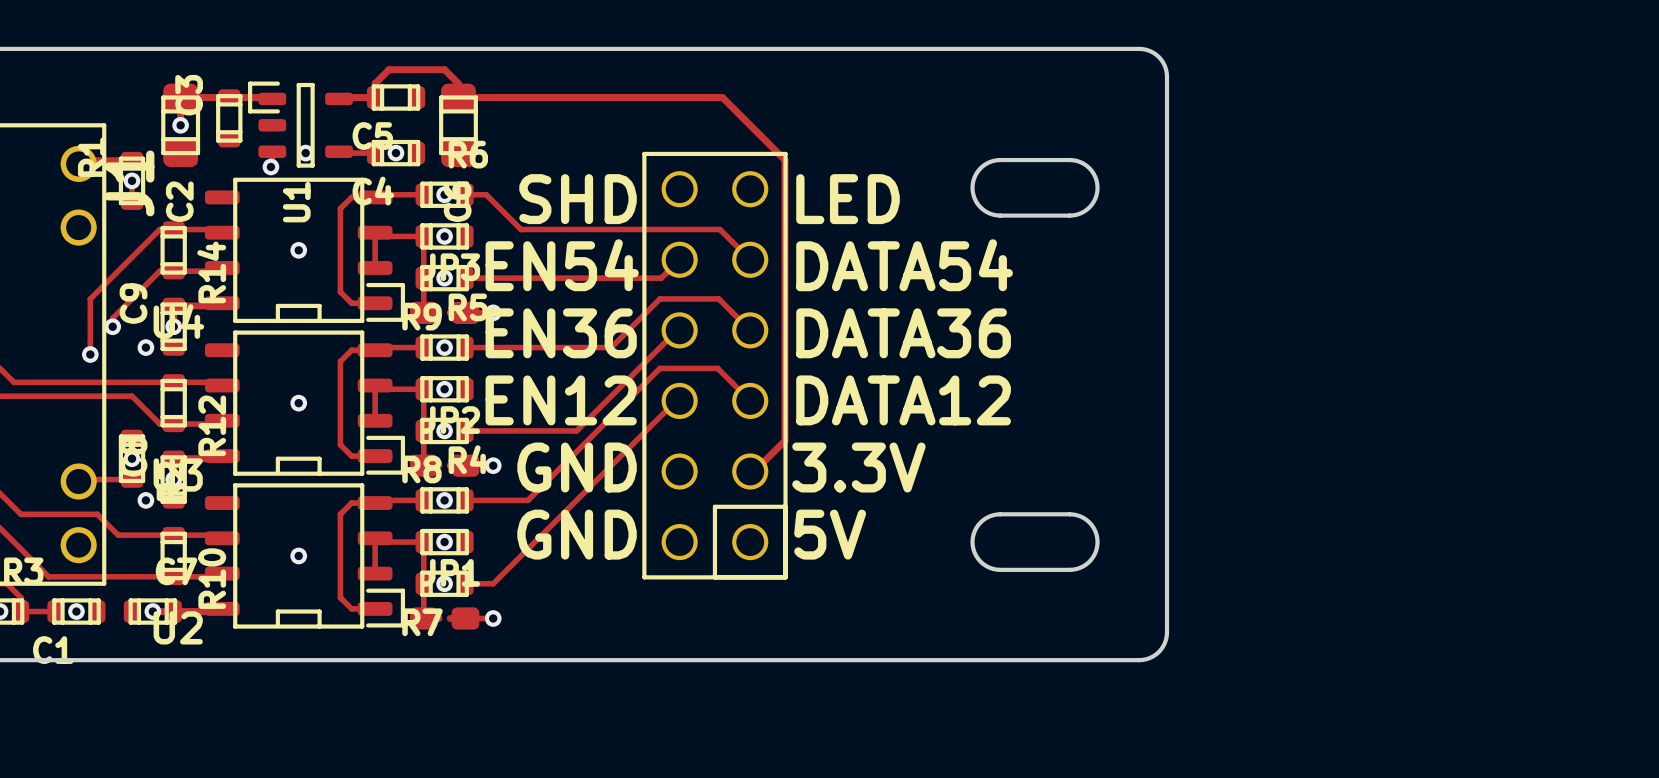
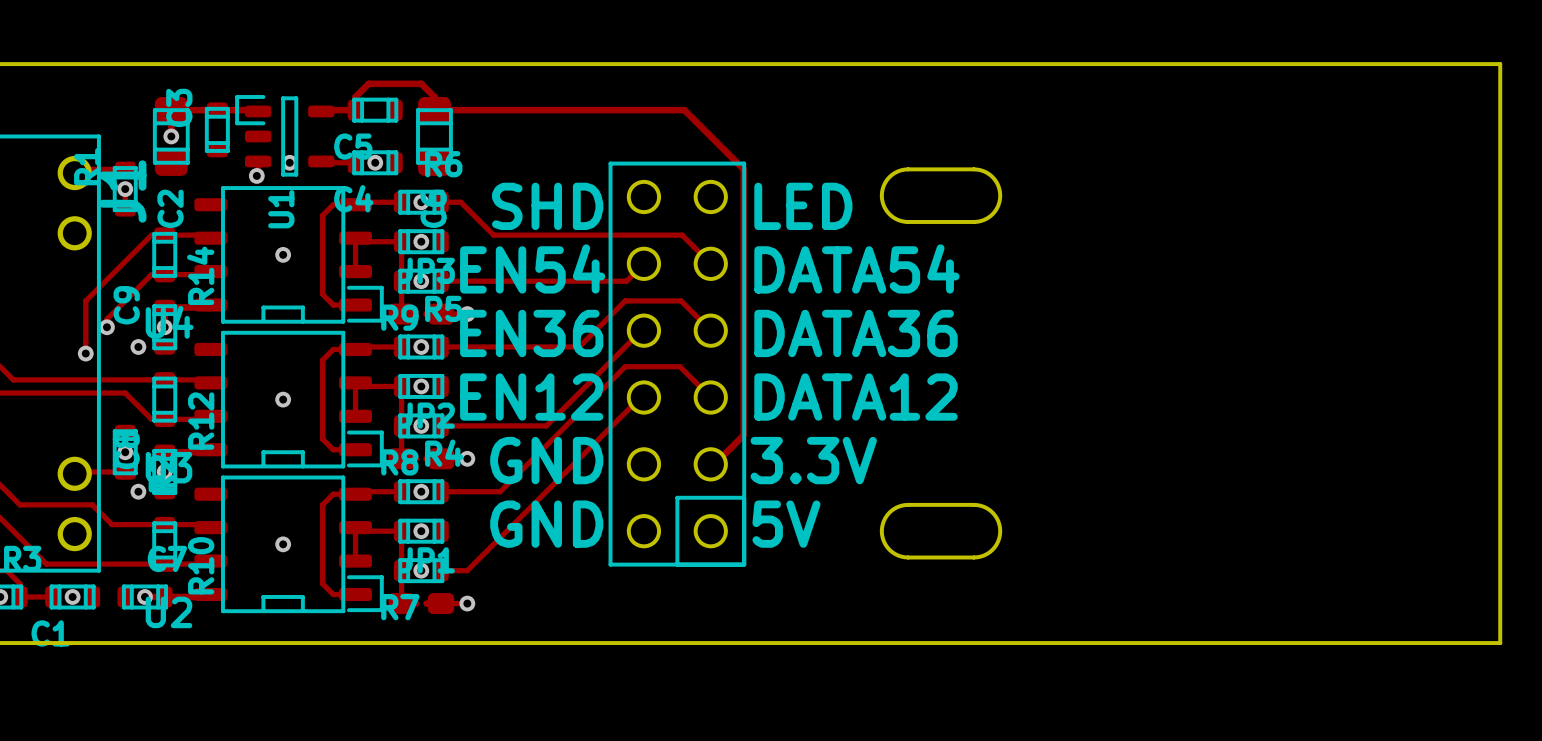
board edge: (1139, 48) (1149, 51) (1158, 57) (1164, 66) (1167, 76) (1167, 632) (1164, 643) (1158, 652) (1149, 658) (1139, 660) -> (1079, 64) (1500, 64) (1500, 643) (1079, 643)
board edge: (1000, 160) (989, 162) (980, 168) (974, 177) (972, 187) (974, 198) (980, 207) (989, 213) (1000, 215) -> (947, 169) (908, 169) (898, 171) (887, 179) (881, 195) (887, 211) (898, 219) (908, 221) (947, 221)
board edge: (1028, 160) (1069, 160) (1080, 162) (1091, 170) (1097, 187) (1091, 204) (1080, 213) (1069, 215) (1028, 215) -> (973, 169) (984, 171) (992, 177) (998, 185) (1000, 195) (998, 205) (992, 214) (984, 219) (973, 221)
board edge: (1000, 514) (989, 516) (980, 522) (974, 531) (972, 542) (974, 552) (980, 561) (989, 567) (1000, 569) -> (947, 504) (908, 504) (898, 506) (887, 515) (881, 531) (887, 547) (898, 555) (908, 557) (947, 557)
board edge: (1028, 514) (1069, 514) (1080, 516) (1091, 525) (1097, 542) (1091, 558) (1080, 567) (1069, 569) (1028, 569) -> (973, 504) (984, 506) (992, 512) (998, 521) (1000, 531) (998, 541) (992, 549) (984, 555) (973, 557)

